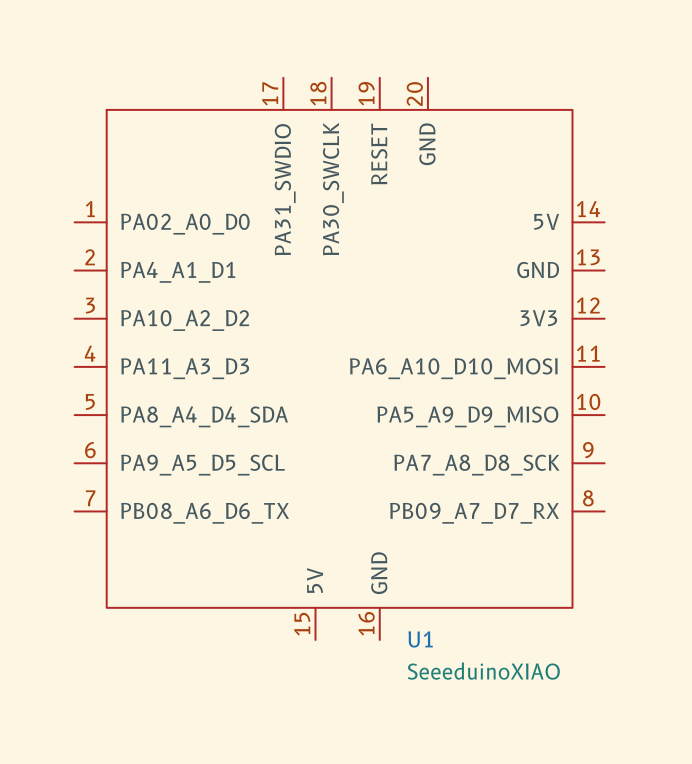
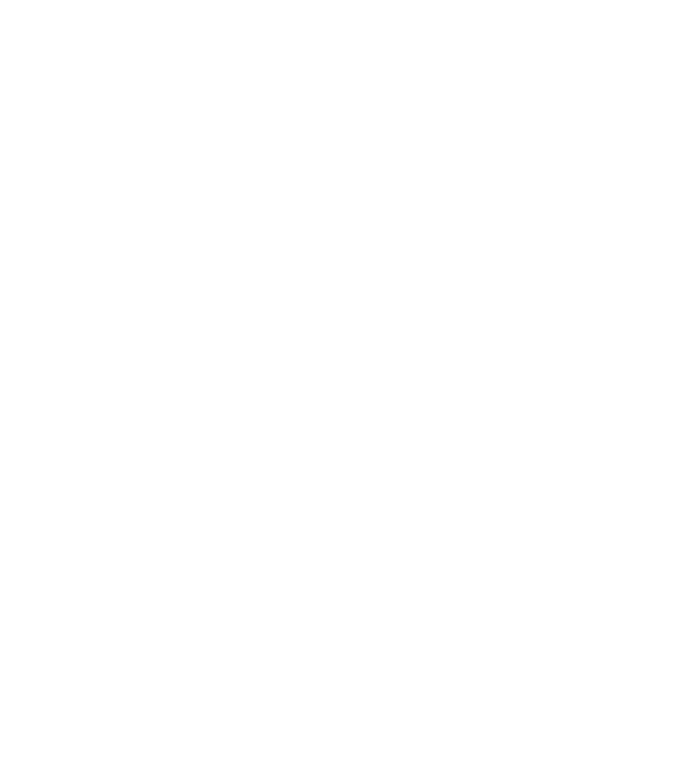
U1: SeeeduinoXIAO (339, 358) -> none

